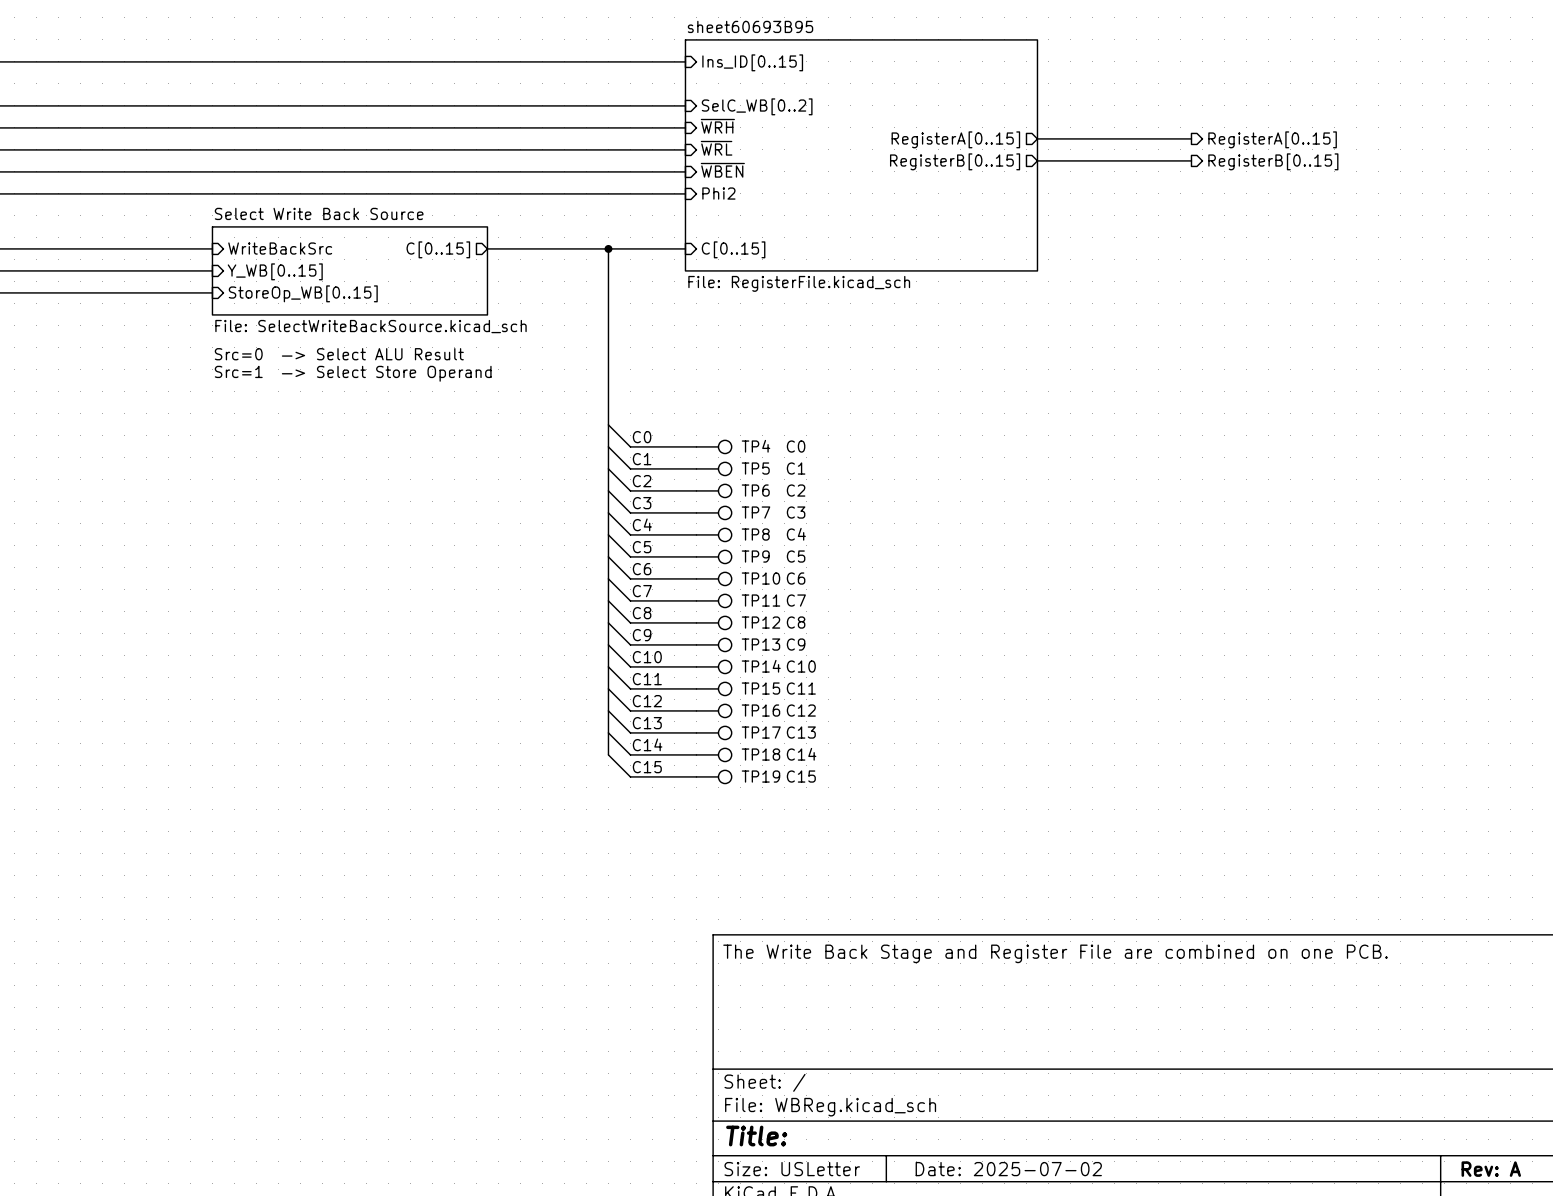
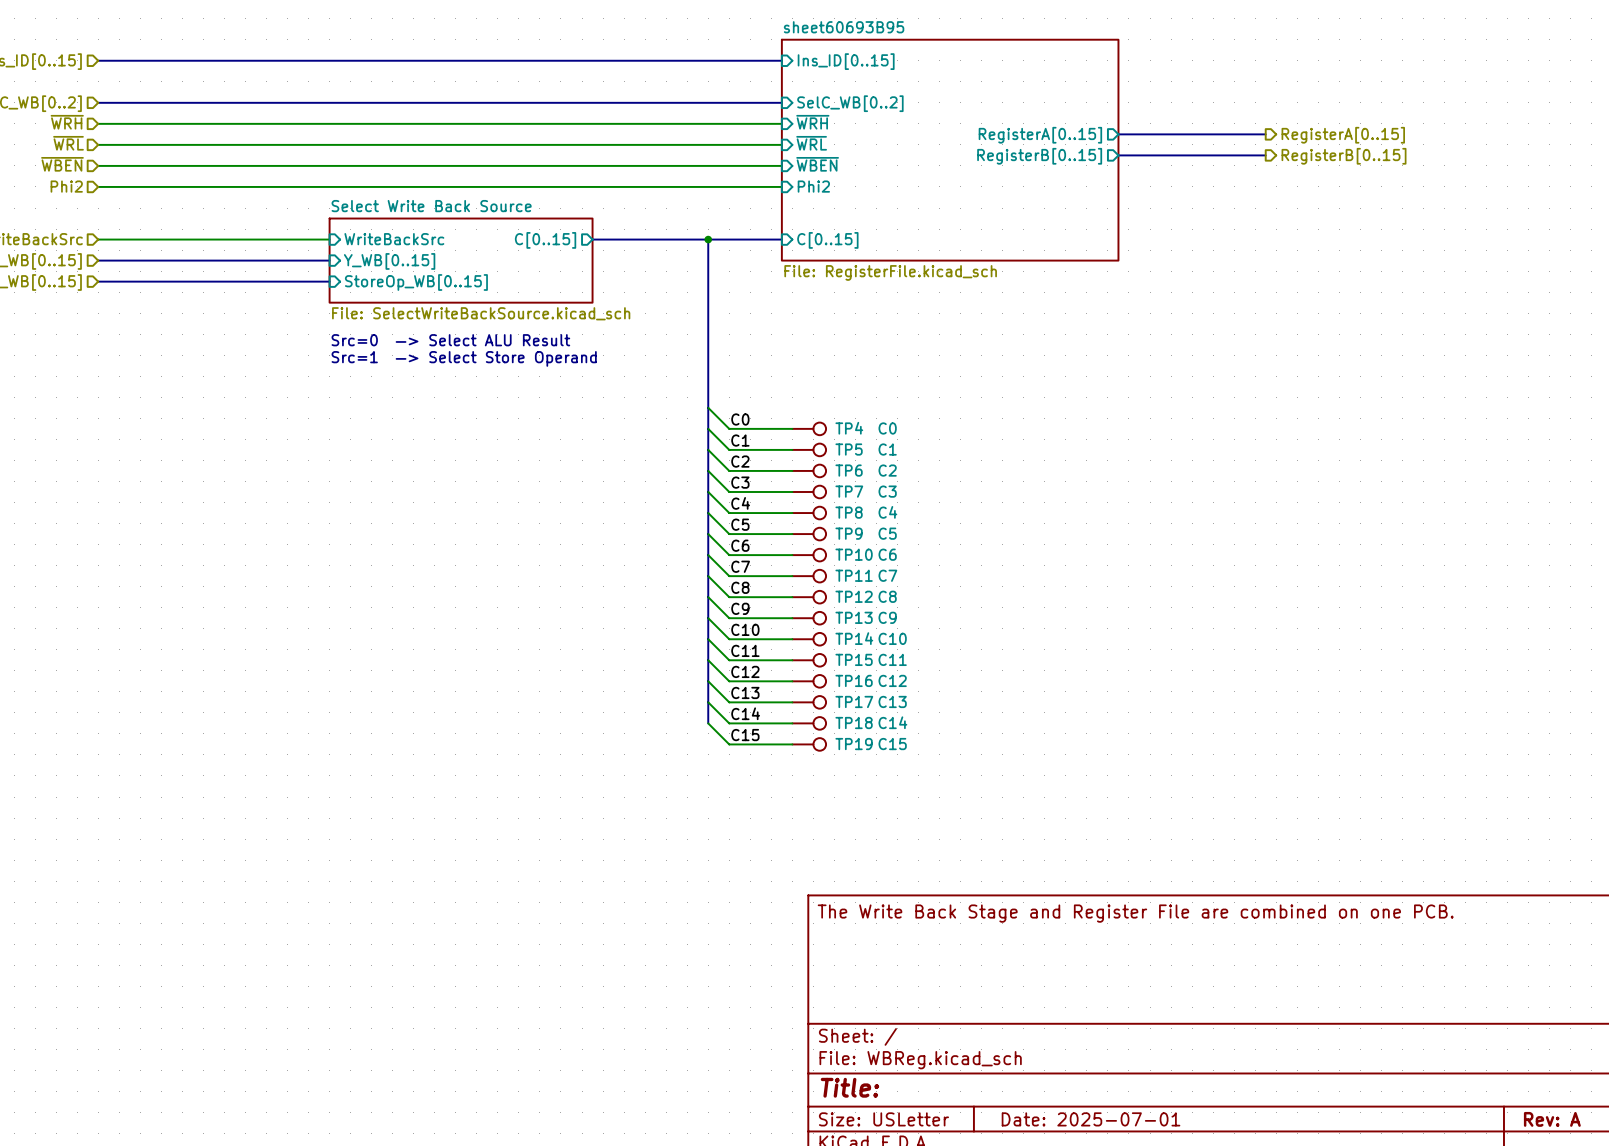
title block: Date: 2025-07-02 (1008, 1169) -> Date: 2025-07-01 (1091, 1119)

